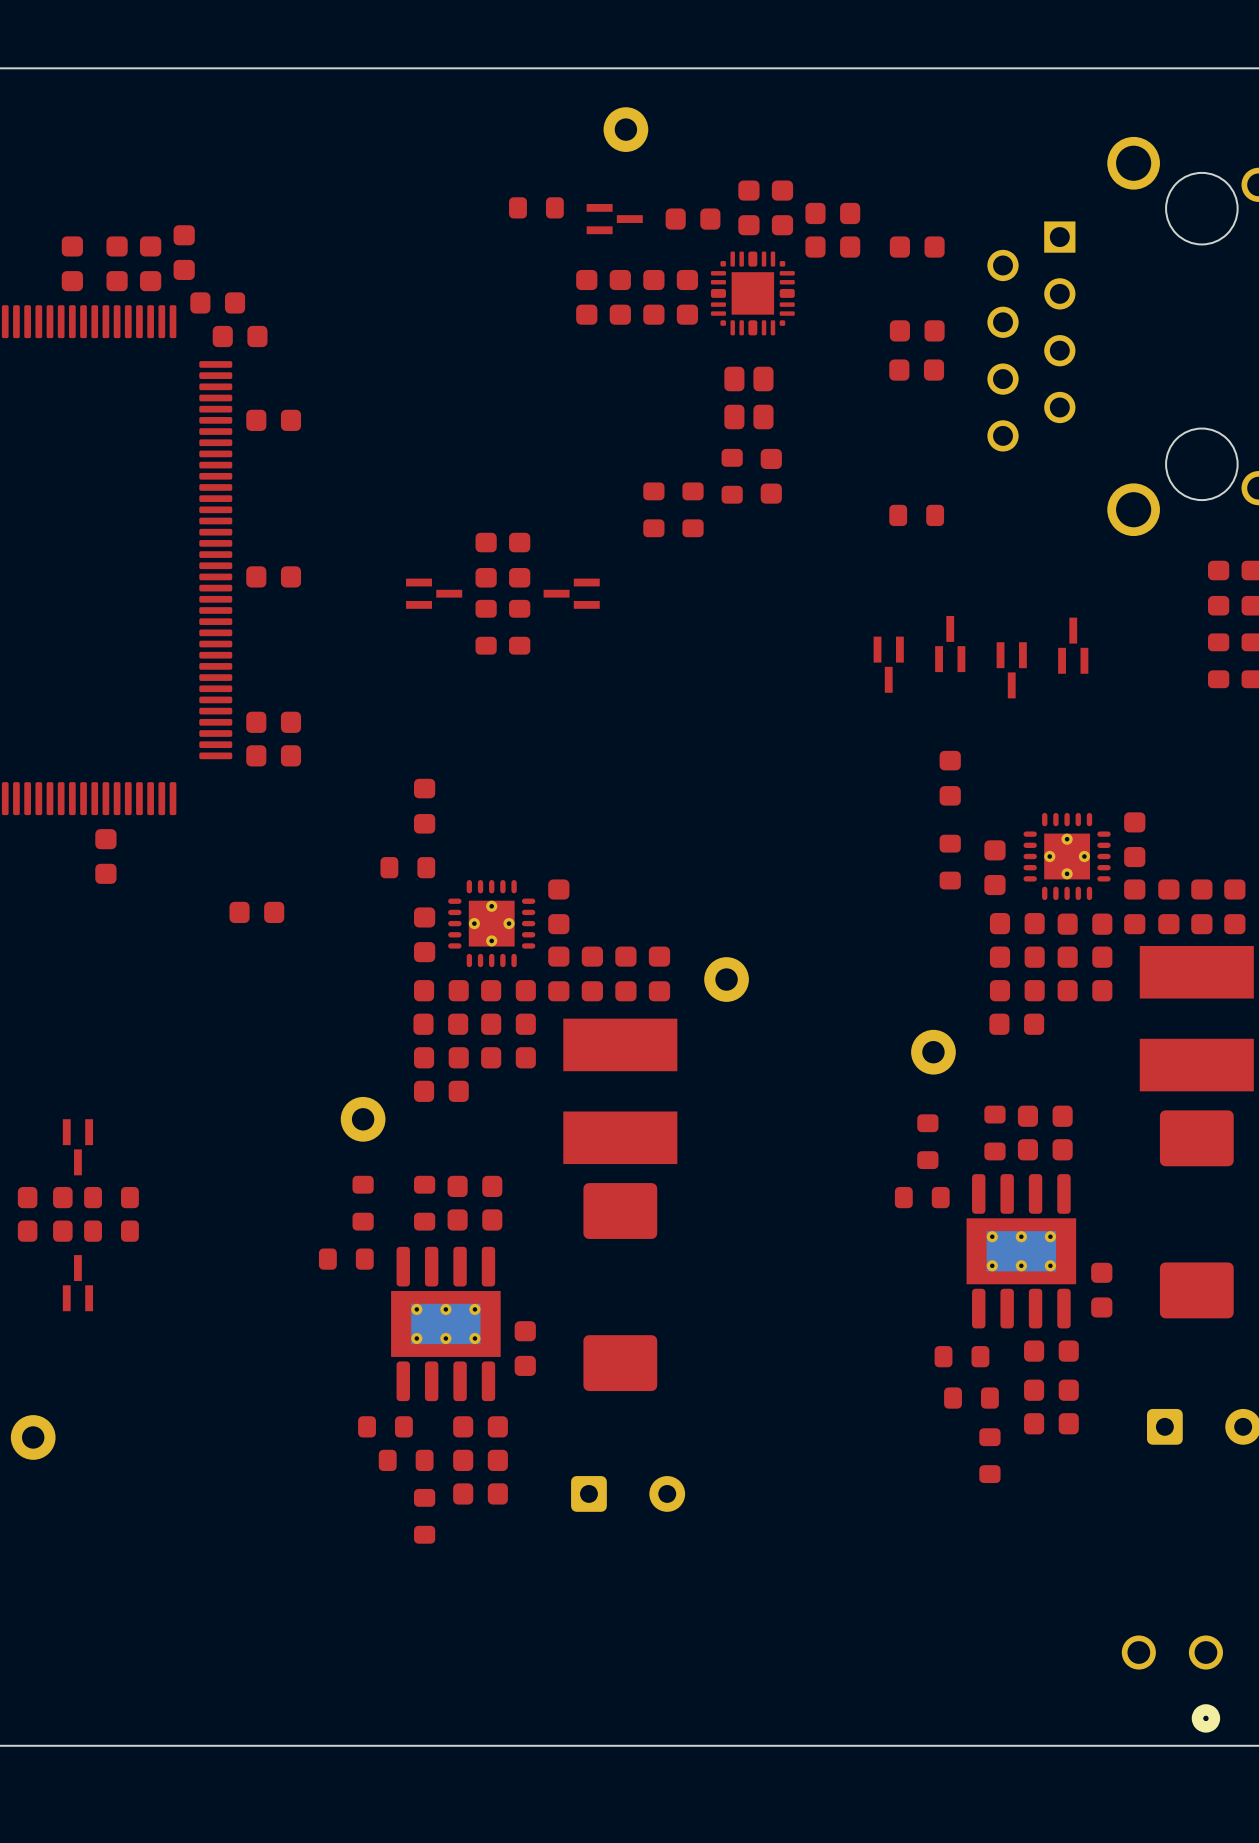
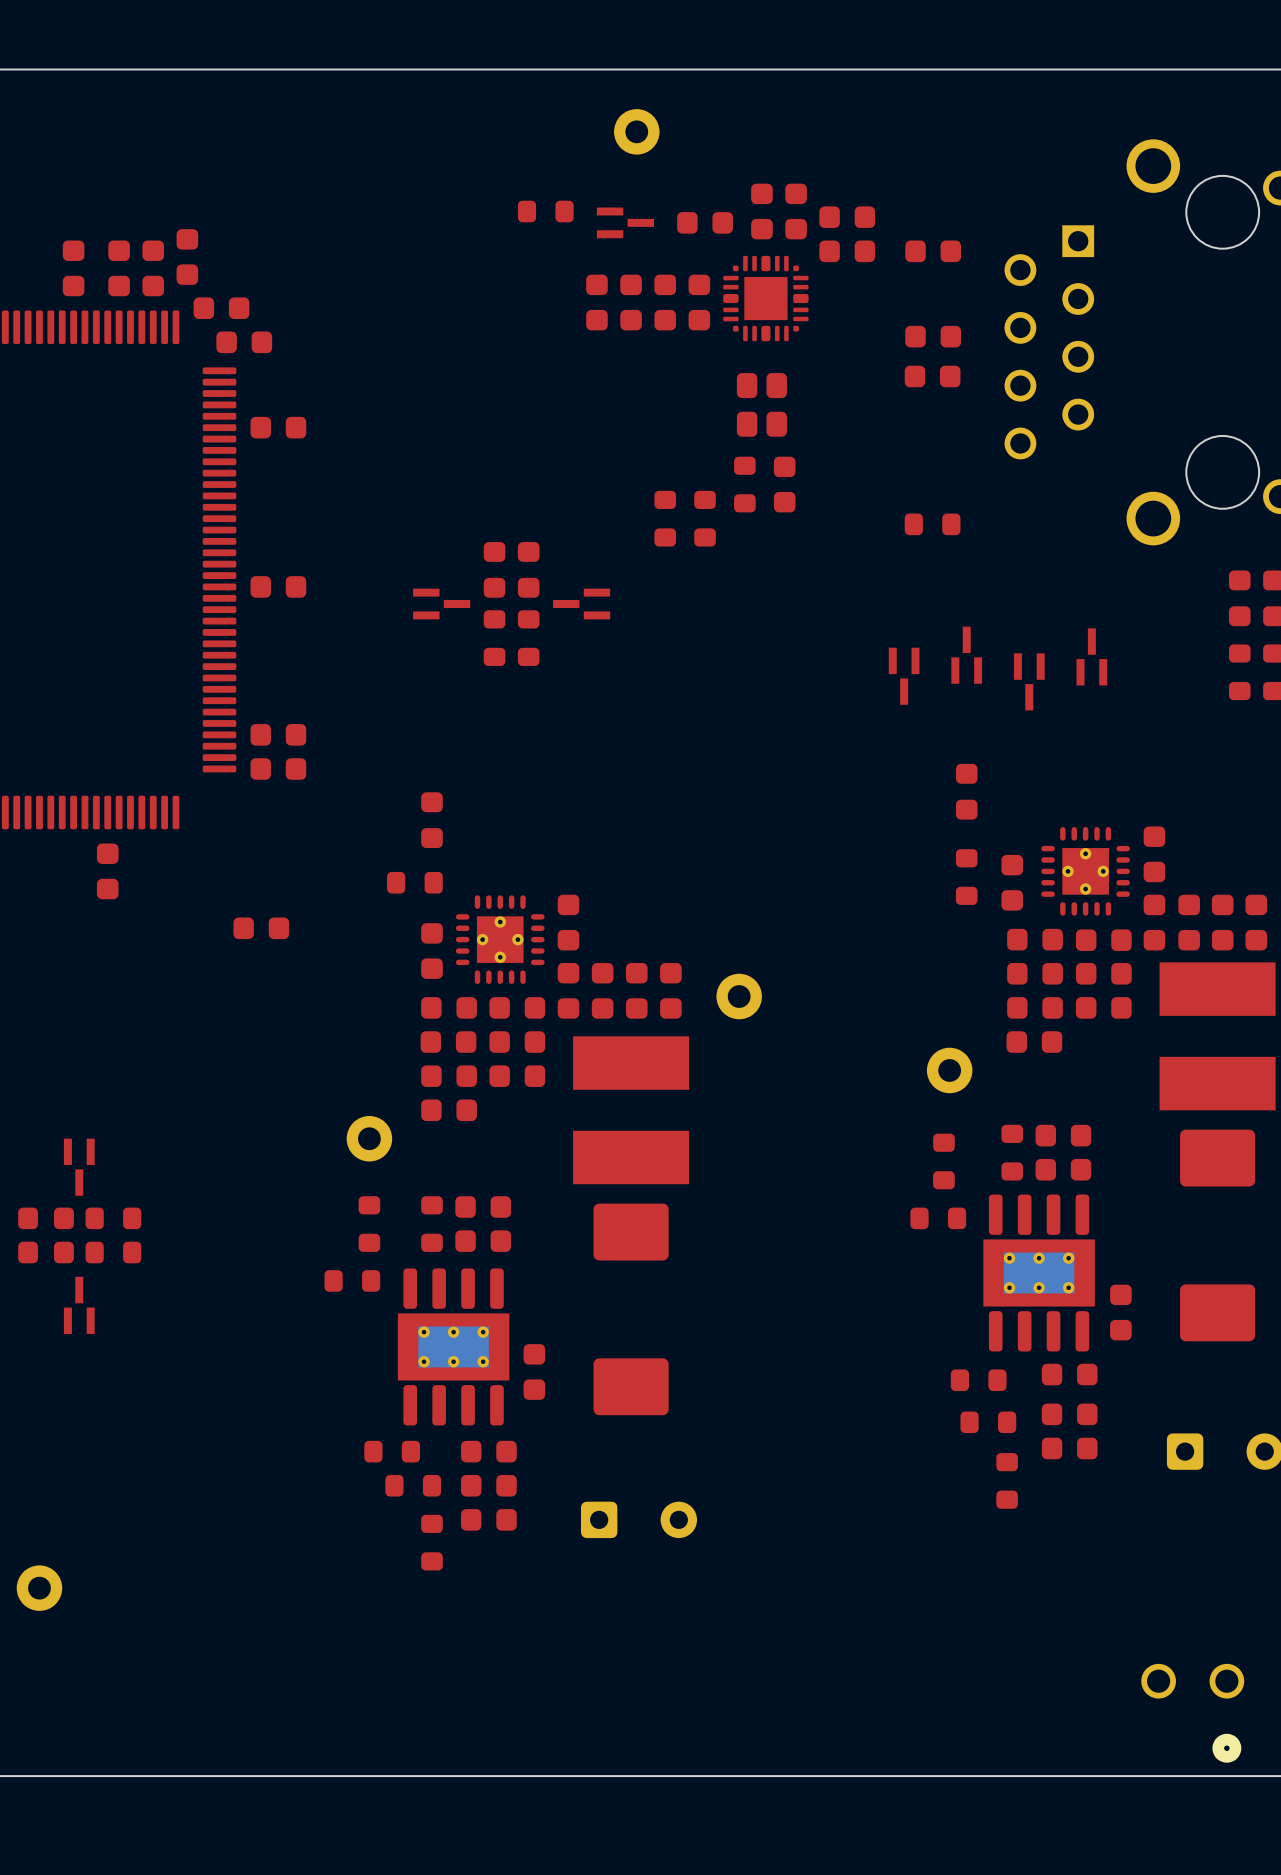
part: (33, 1437) -> none
part: none -> (39, 1588)

